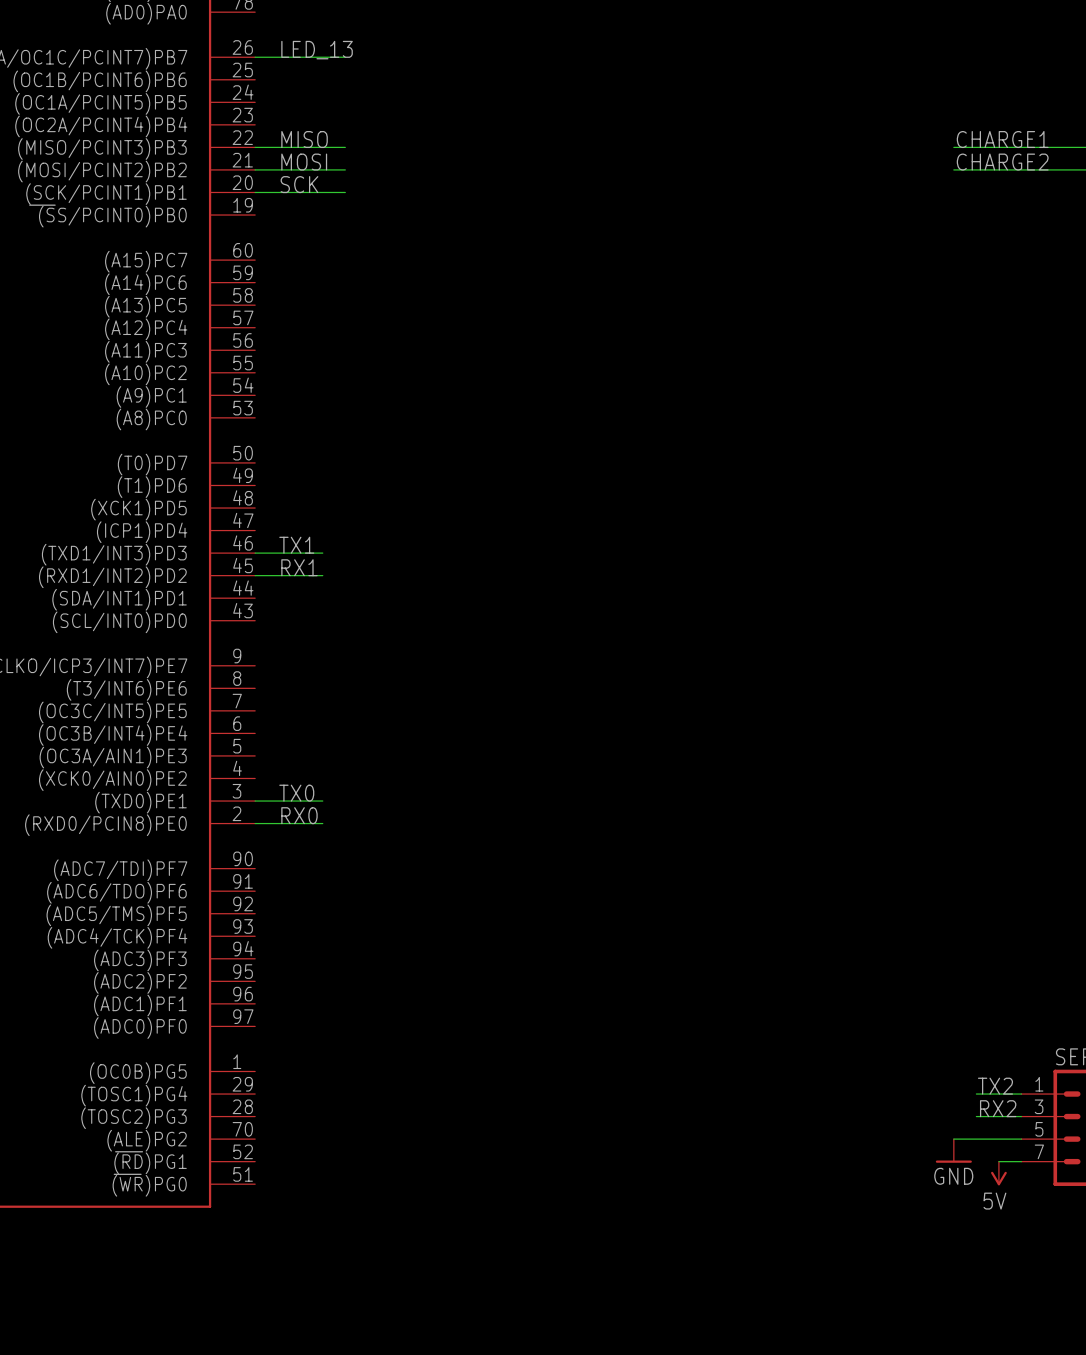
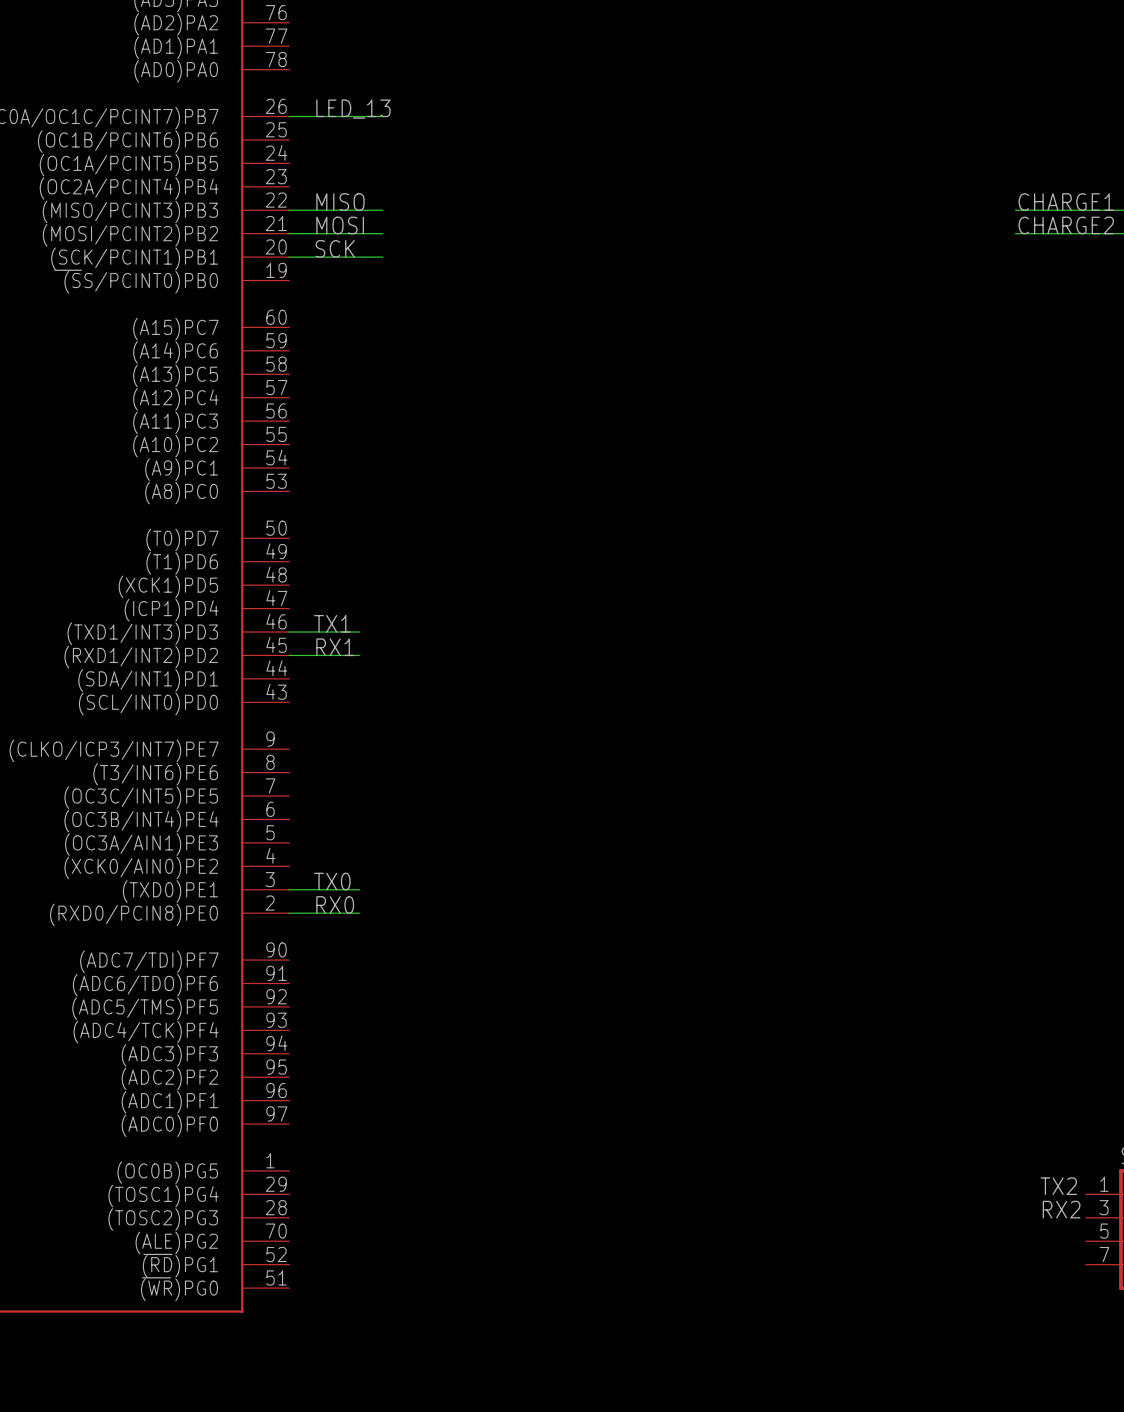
wire: (976, 1094) (1021, 1094) -> none
wire: (976, 1116) (1021, 1116) -> none
wire: (953, 1139) (1021, 1139) -> none
power symbol: GND (953, 1150) -> none
wire: (998, 1161) (1021, 1161) -> none
power symbol: 5V (998, 1173) -> none

